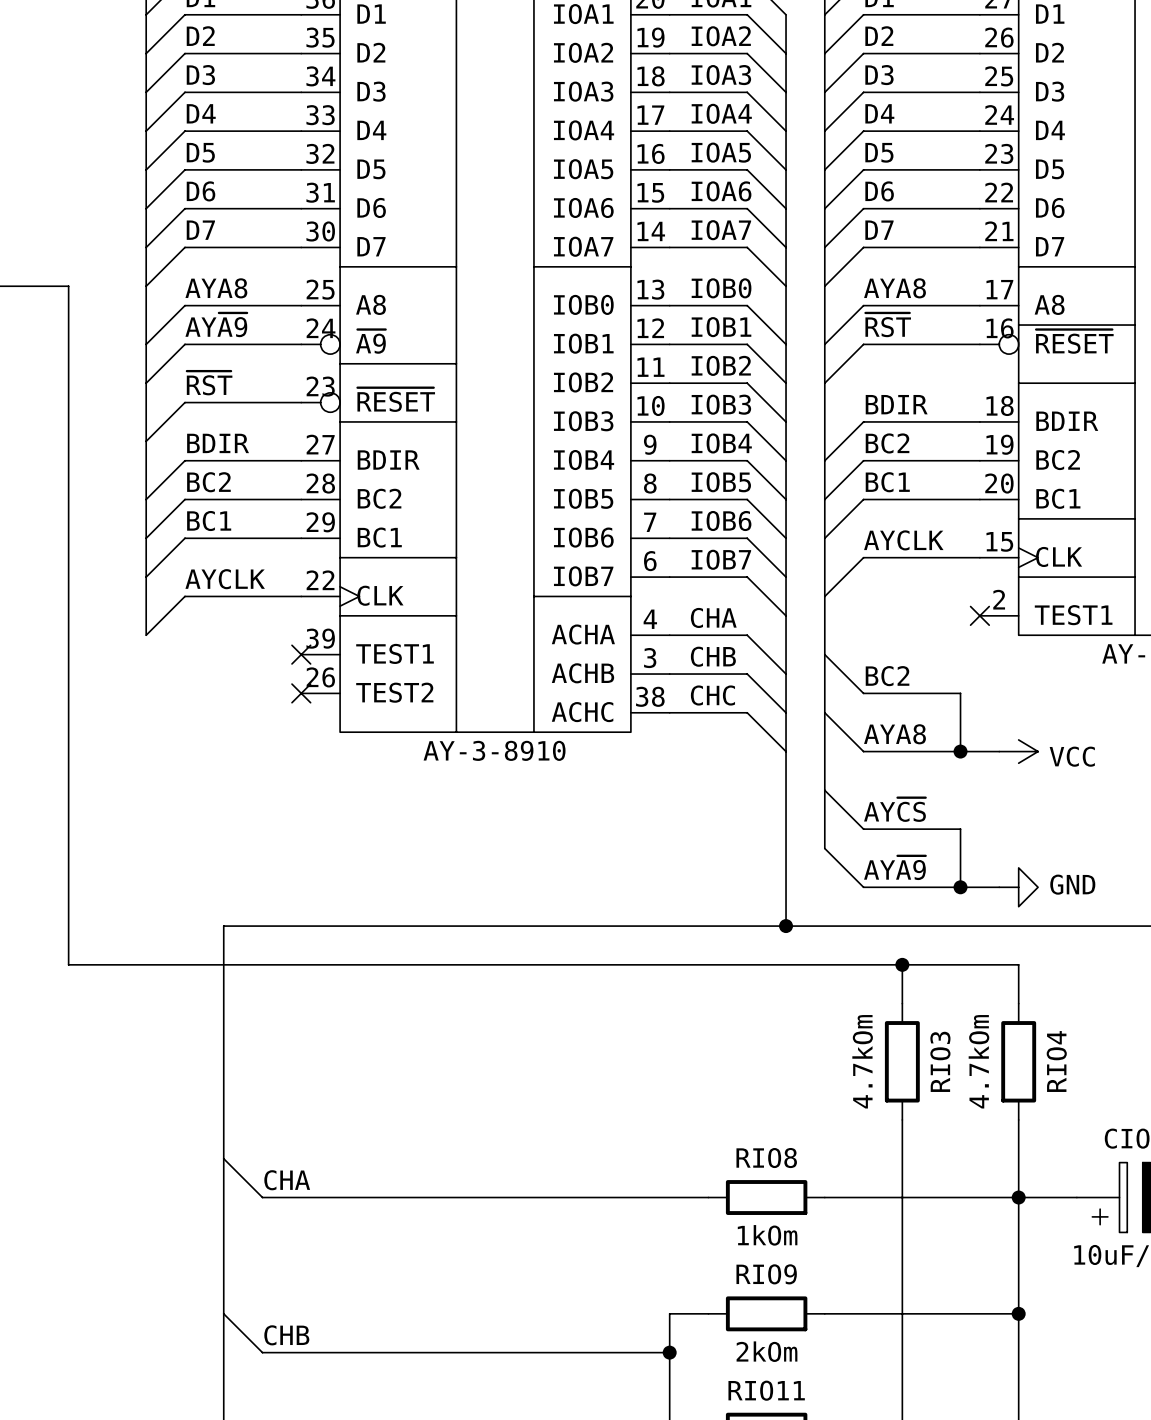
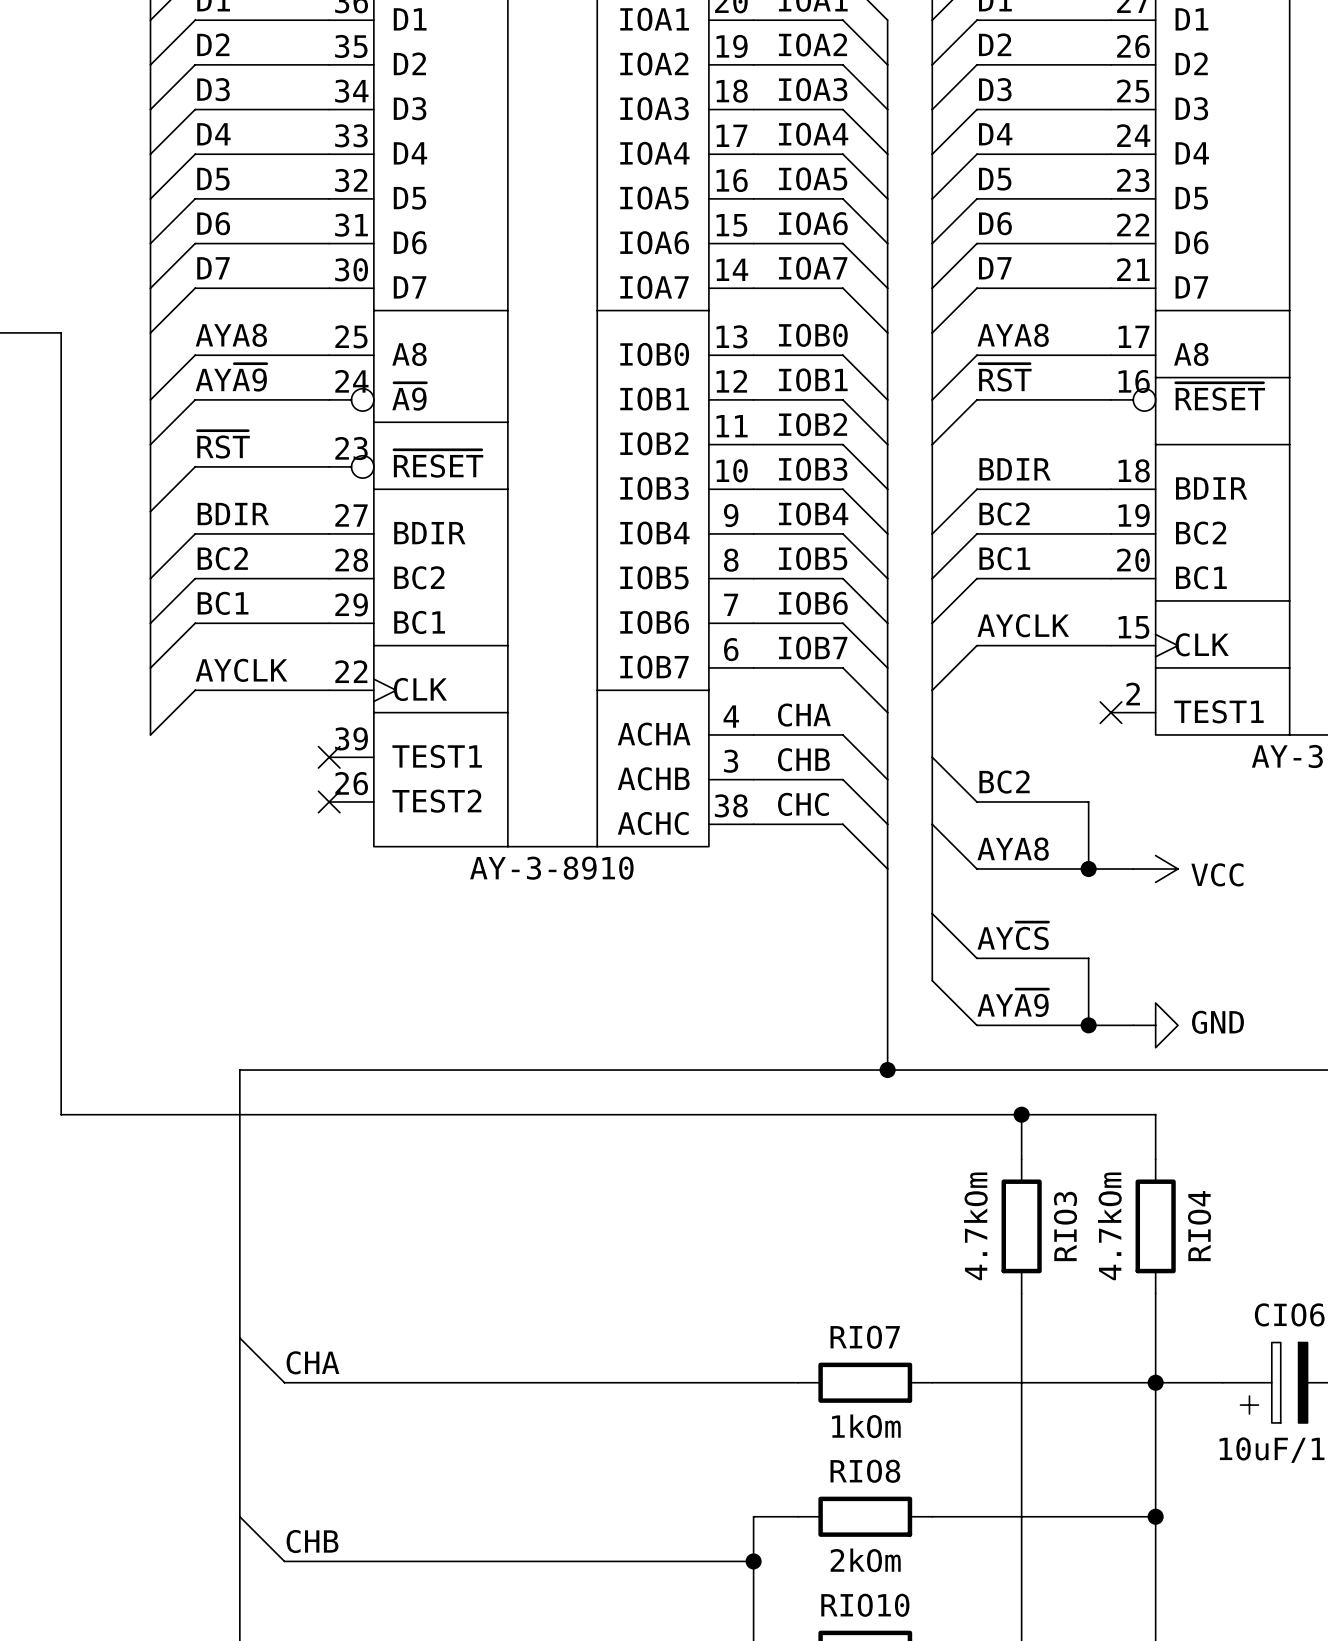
RIO8 name: RIO8 (766, 1158) -> RIO7 (865, 1337)
RIO9 name: RIO9 (766, 1274) -> RIO8 (865, 1471)
RIO11 name: RIO11 (766, 1390) -> RIO10 (865, 1605)

